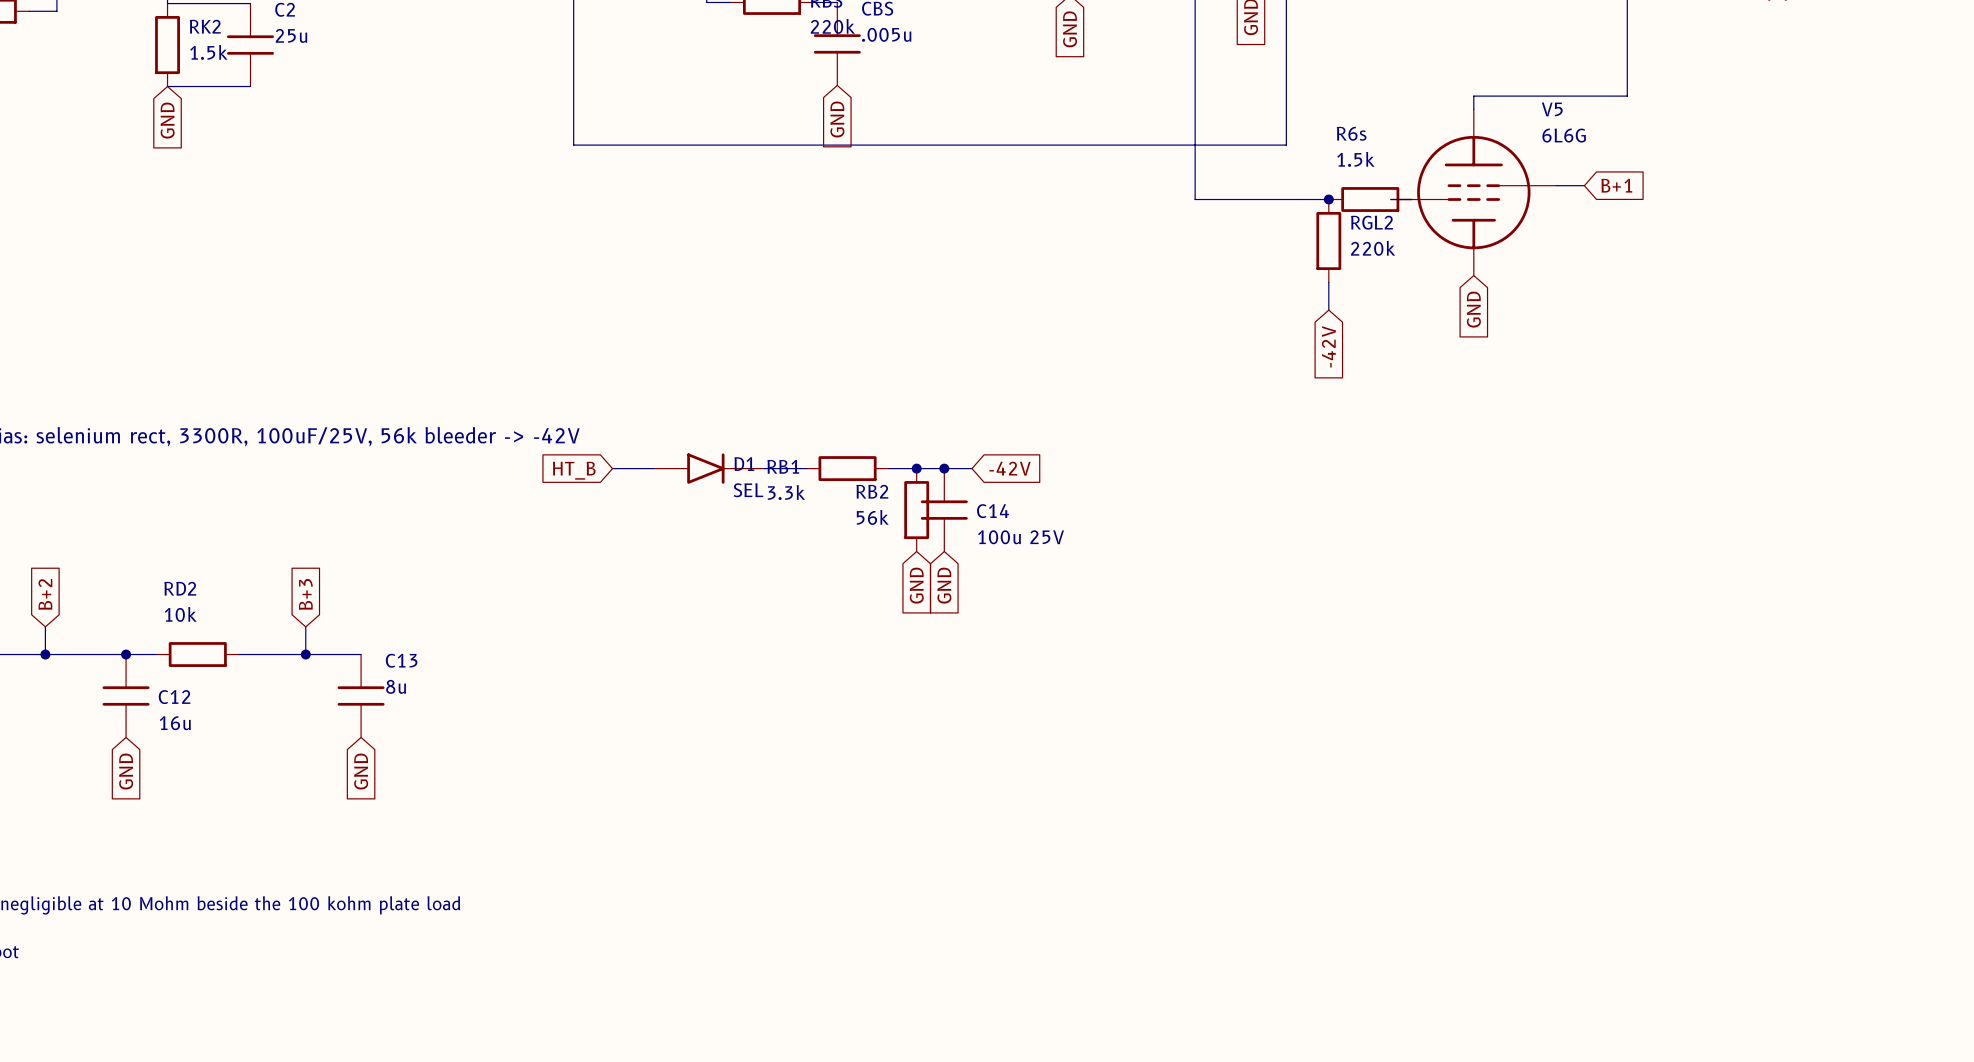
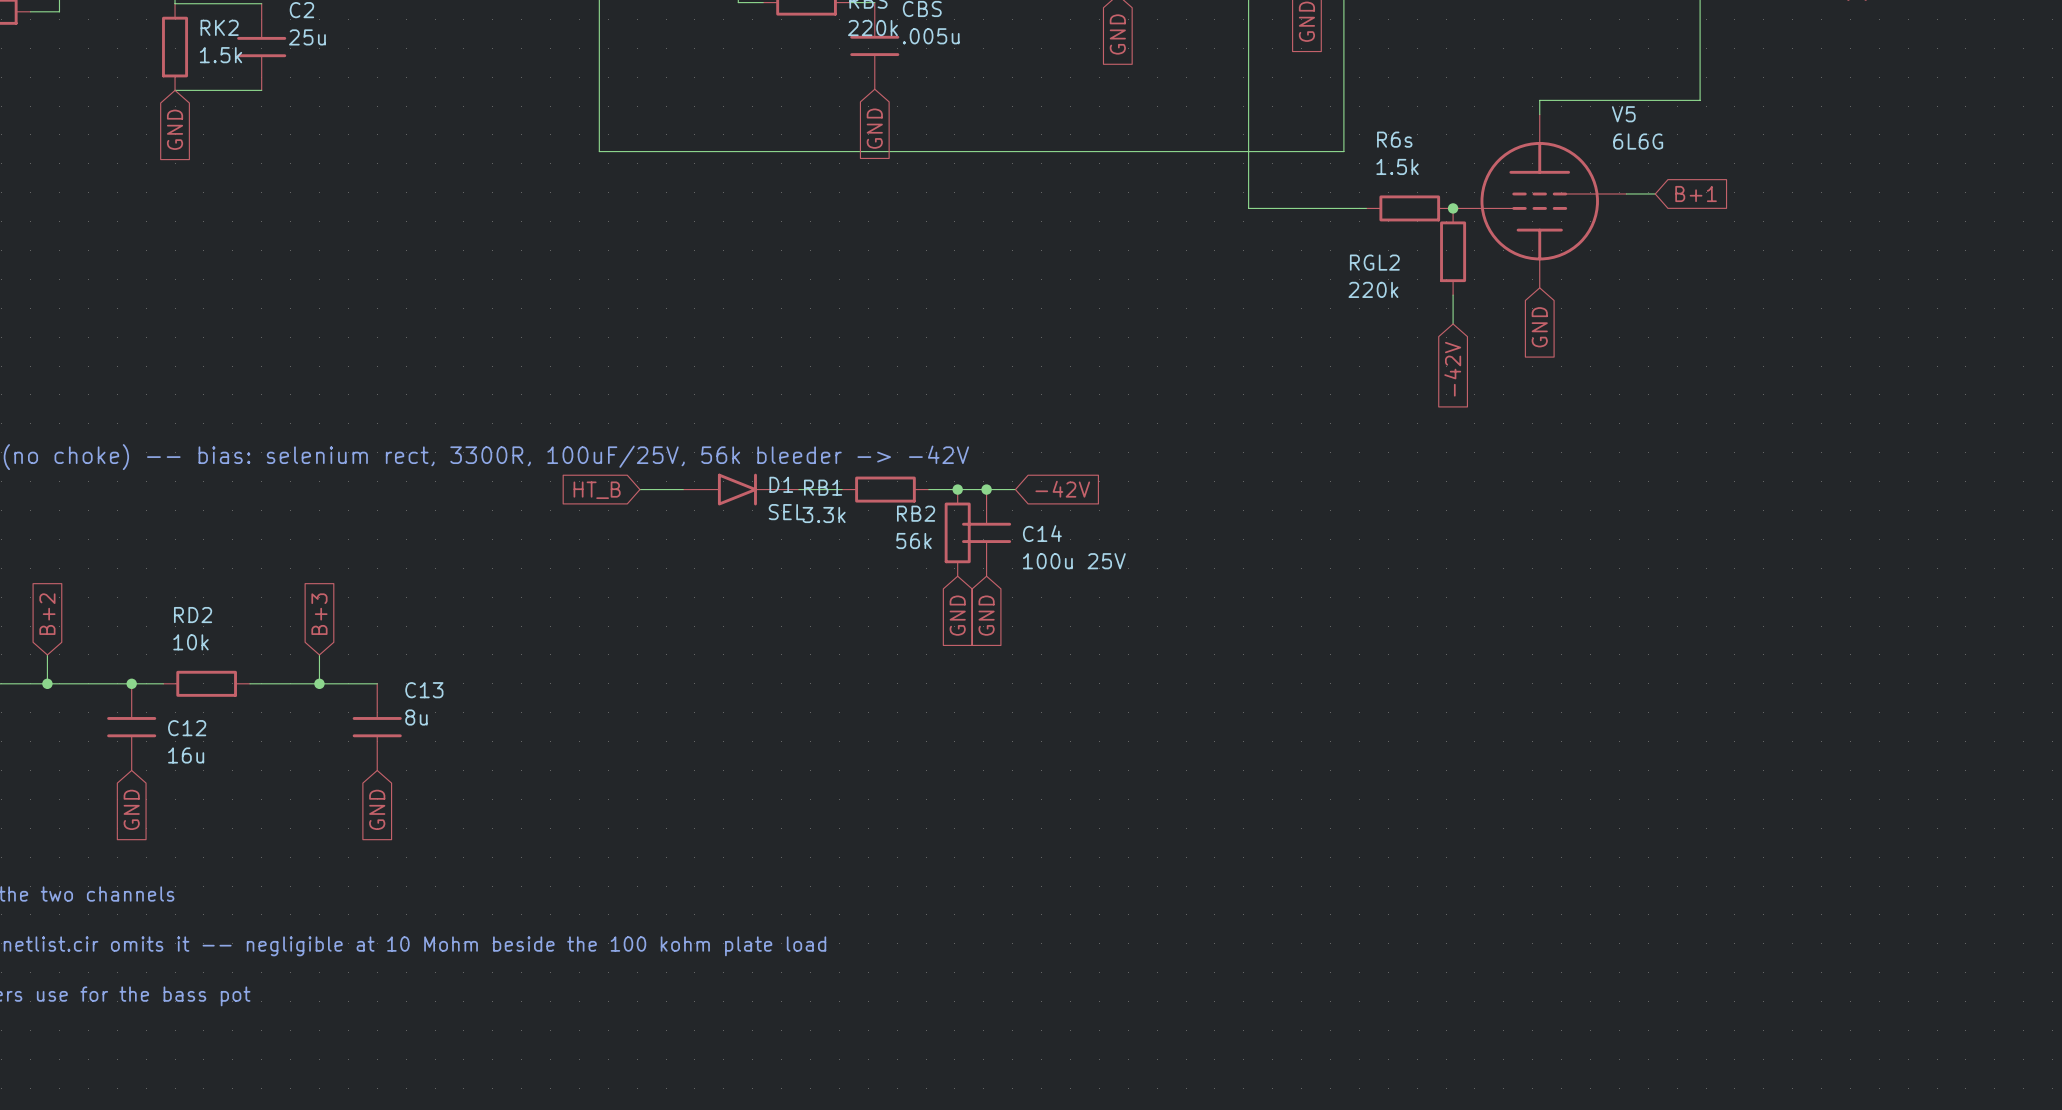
junction position: (1328, 199) -> (1453, 208)
R6s position: (1370, 199) -> (1409, 208)
RGL2 name position: RGL2 (1372, 222) -> RGL2 (1374, 262)
RGL2 position: (1328, 240) -> (1453, 251)
RGL2 value position: 220k (1373, 248) -> 220k (1373, 289)
wire: (1328, 282) (1328, 310) -> (1453, 295) (1453, 323)
global label position: -42V (1328, 346) -> -42V (1452, 369)

